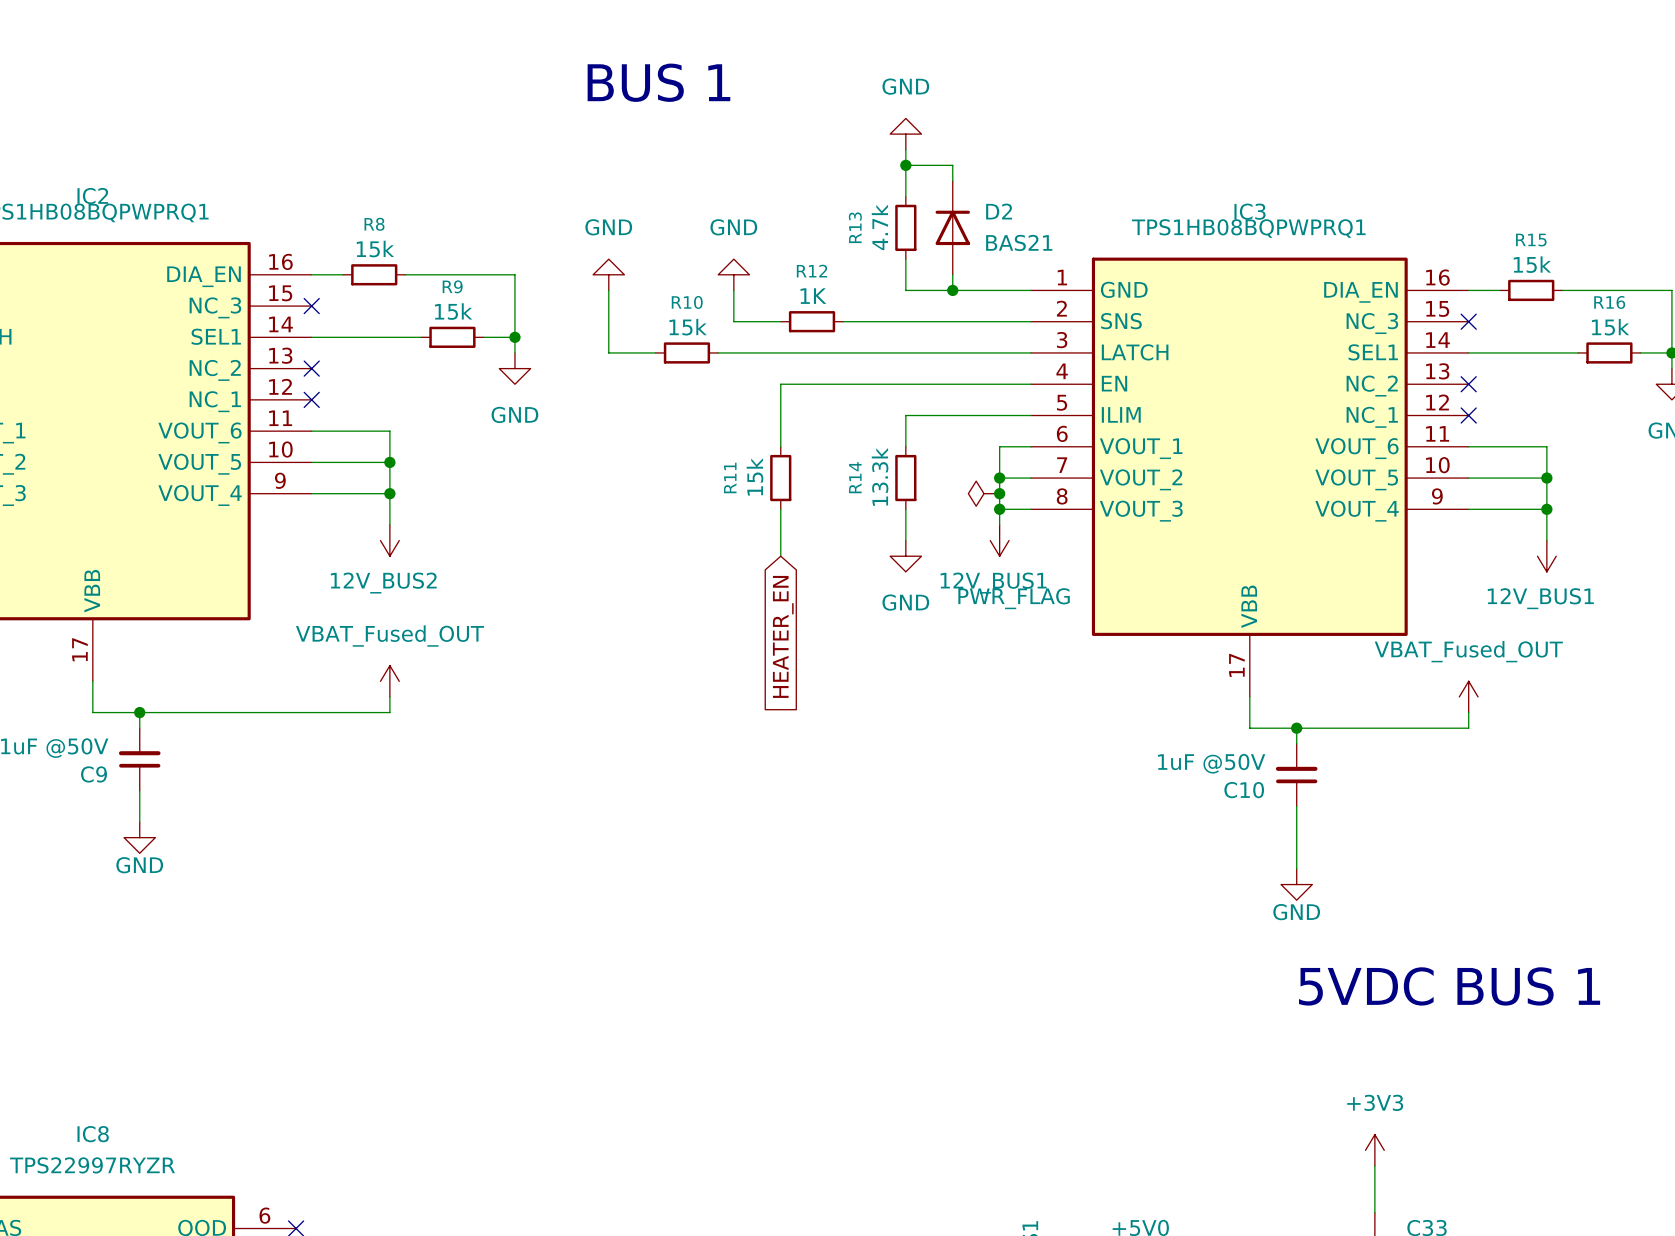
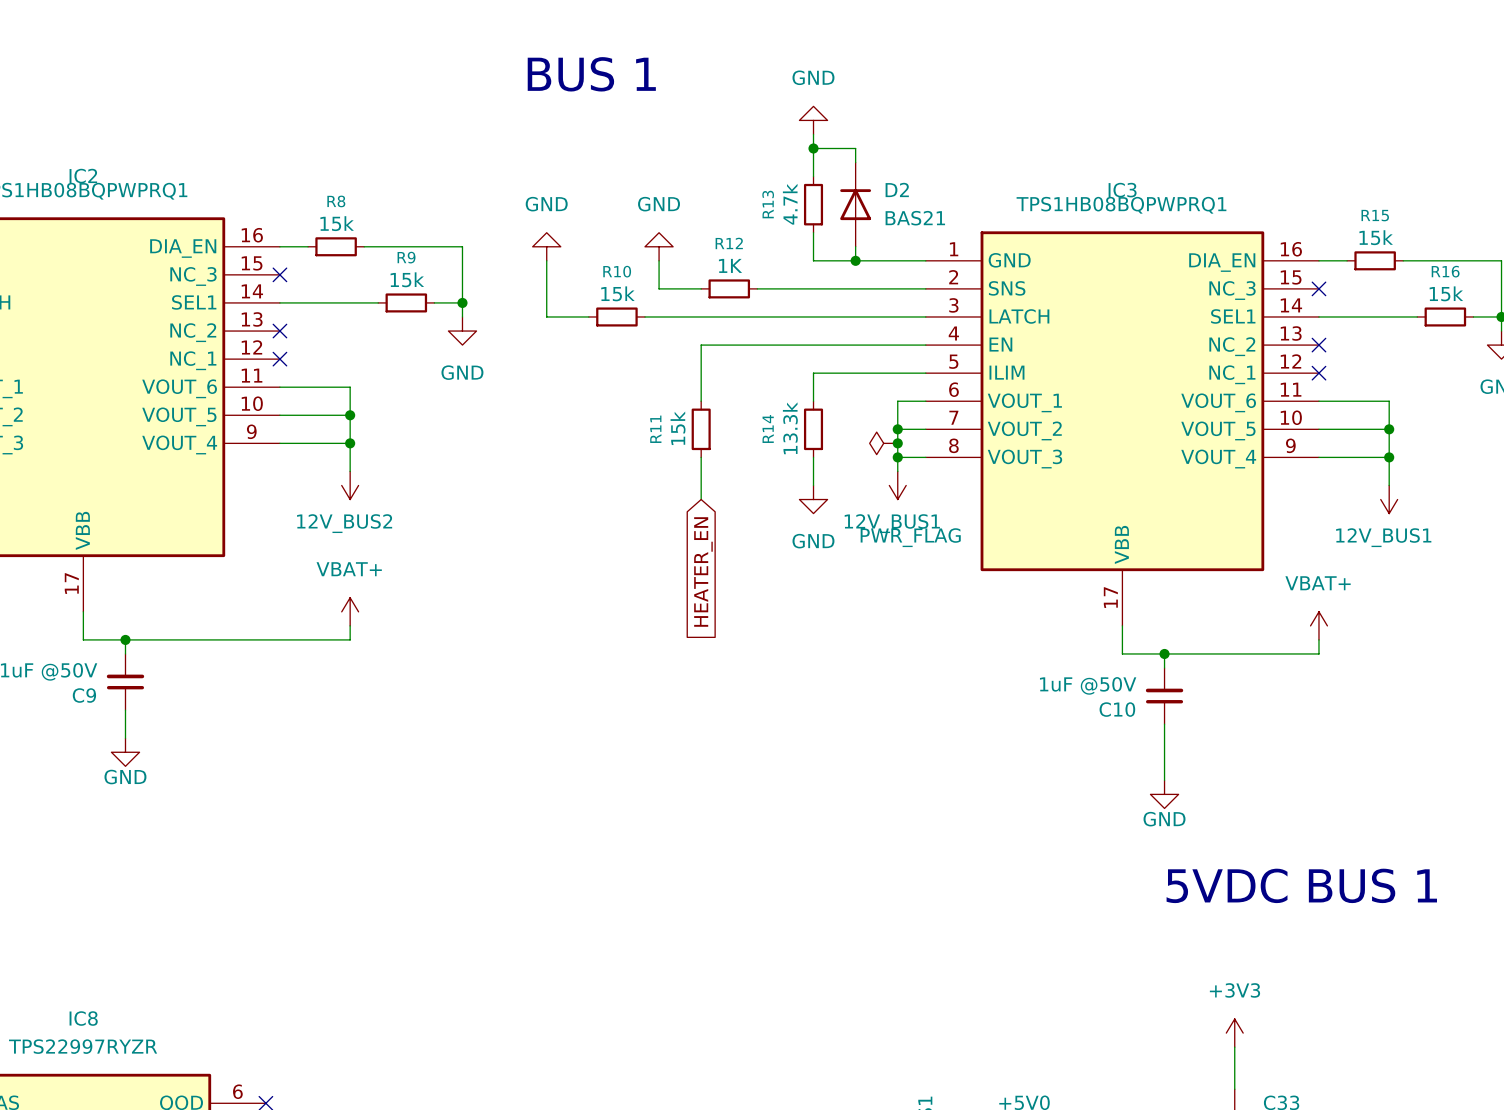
power symbol: VBAT_Fused_OUT (389, 681) -> VBAT+ (350, 611)
power symbol: VBAT_Fused_OUT (1468, 696) -> VBAT+ (1318, 625)

